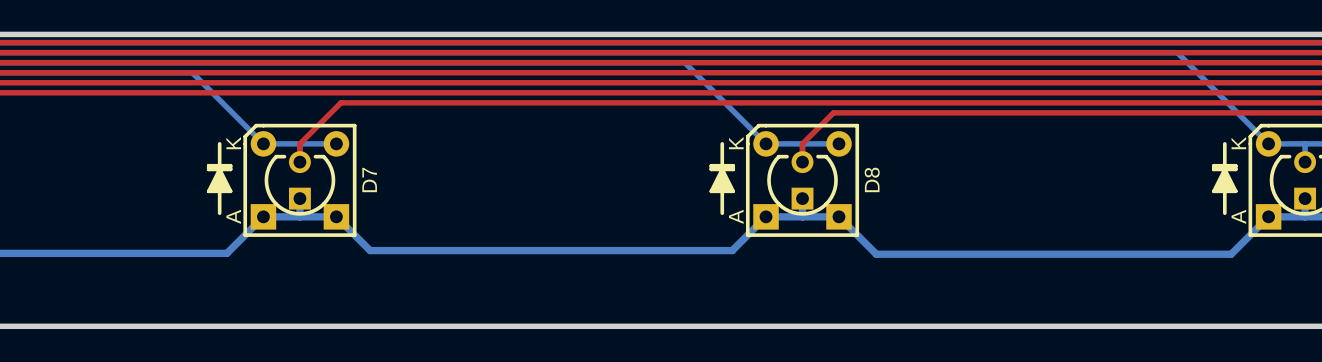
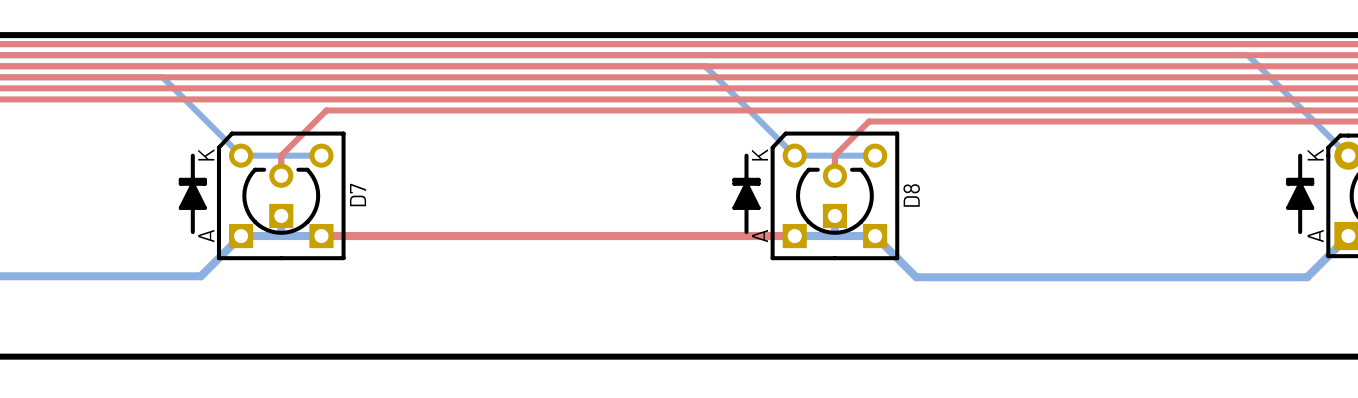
D7 footprint: [206, 123, 357, 237] -> [178, 131, 346, 261]
D8 footprint: [709, 123, 860, 237] -> [732, 131, 900, 261]
bottom track: (336, 216) (370, 250) (732, 250) (766, 216) -> none
top track: none -> (321, 236) (794, 236)

